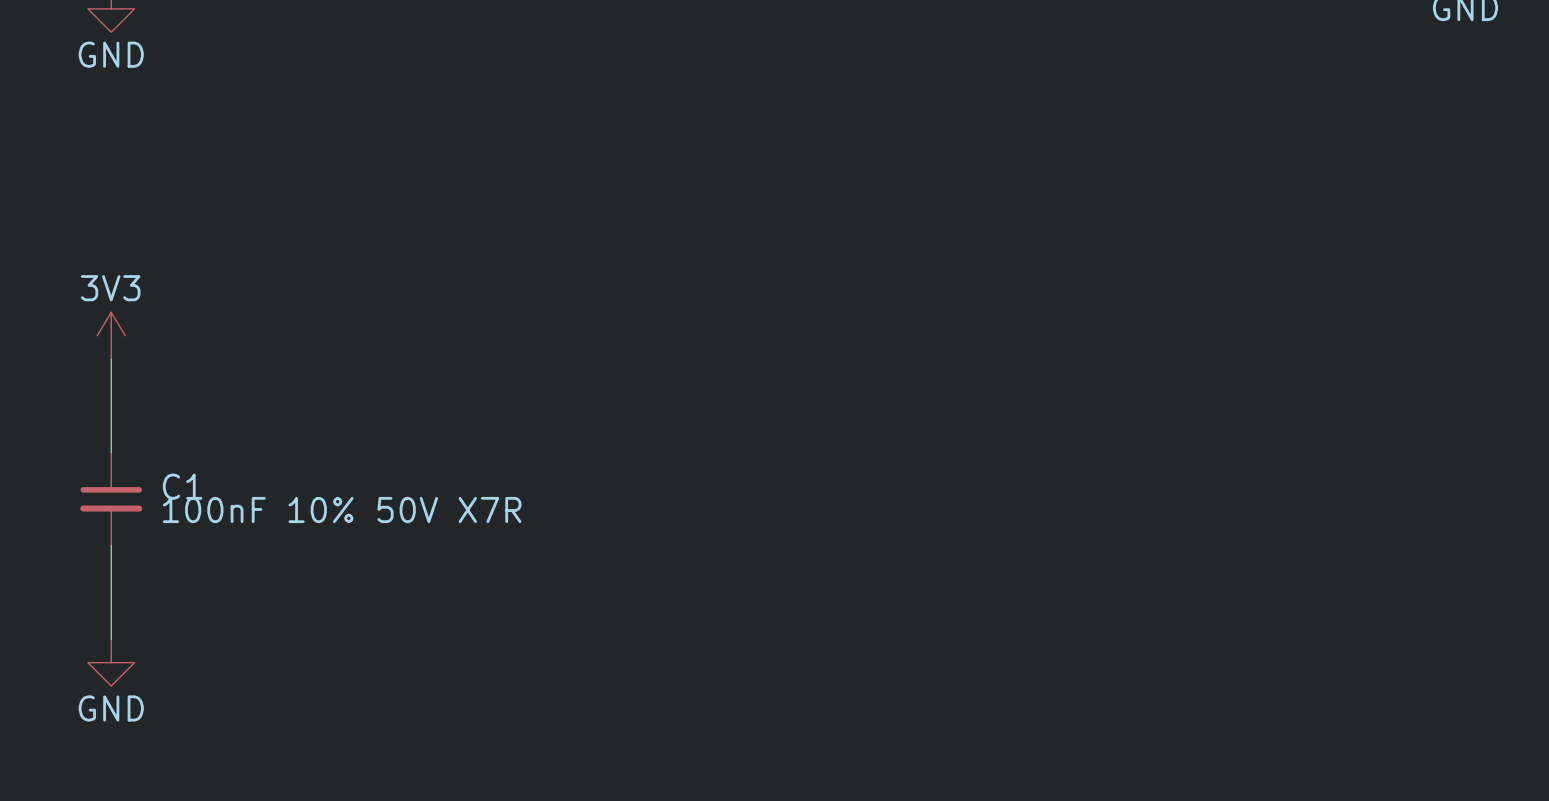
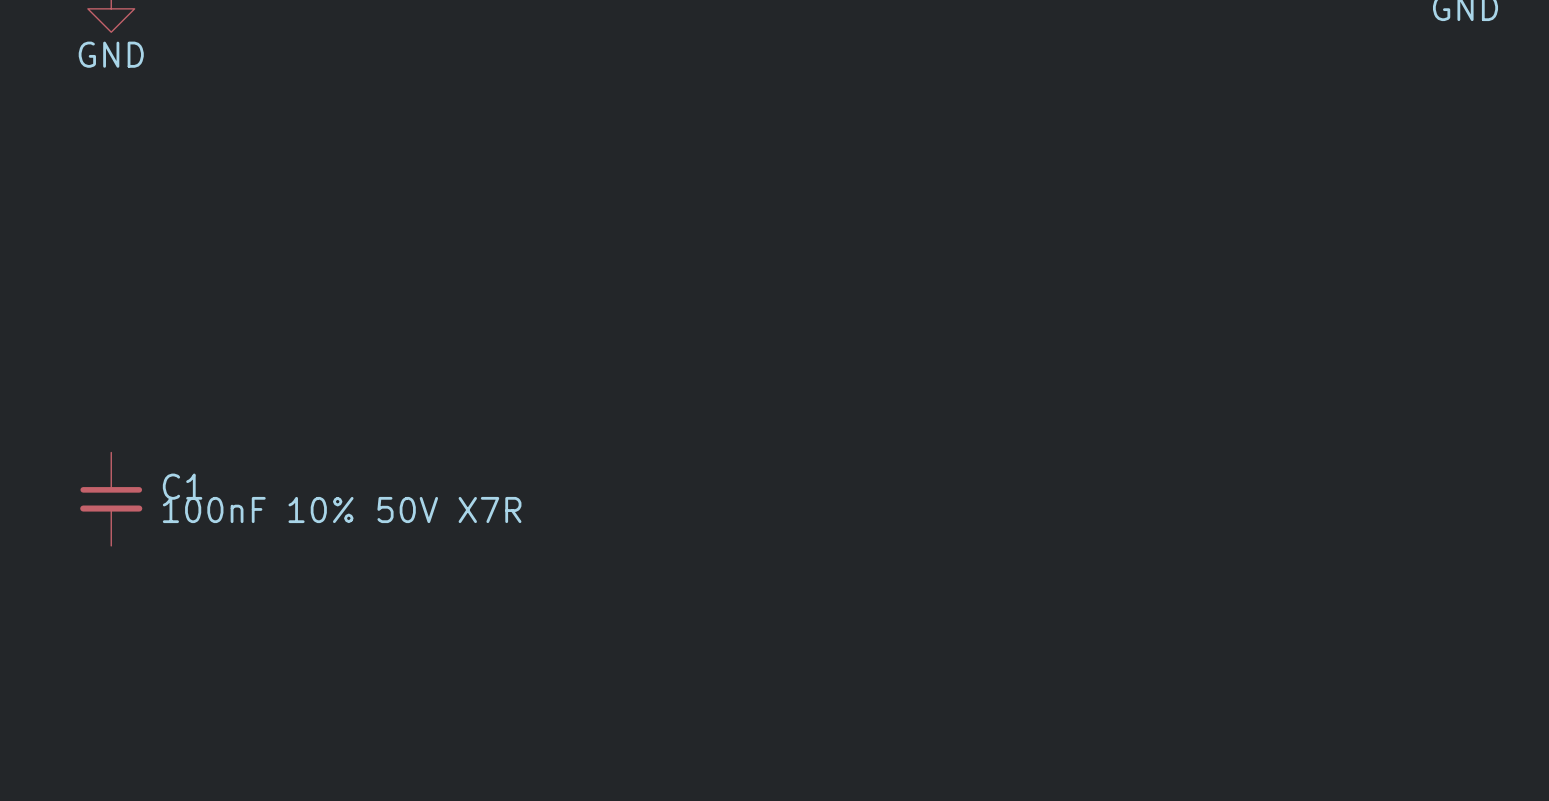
power symbol: 3V3 (111, 335) -> none
wire: (111, 359) (111, 452) -> none
wire: (111, 545) (111, 639) -> none
power symbol: GND (111, 662) -> none

